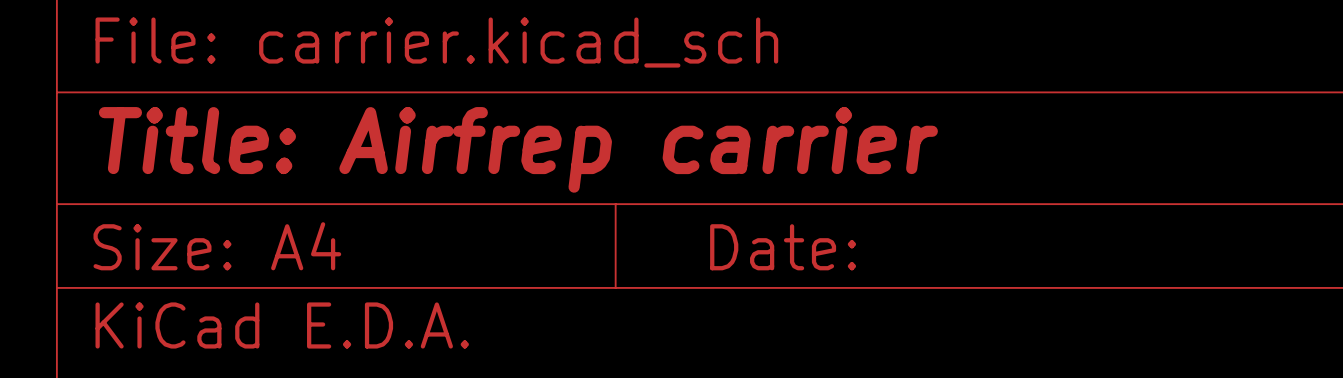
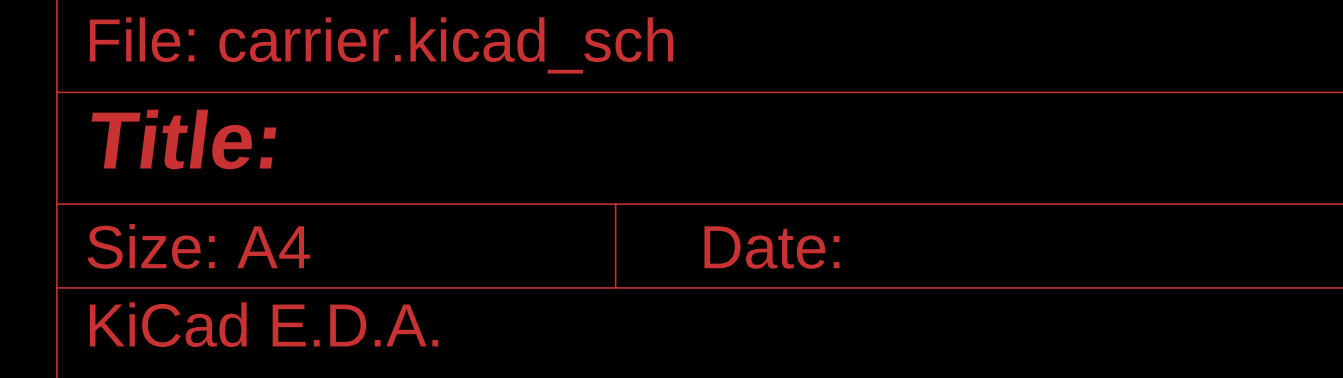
title block: Title: Airfrep carrier (518, 149) -> Title: (183, 139)

